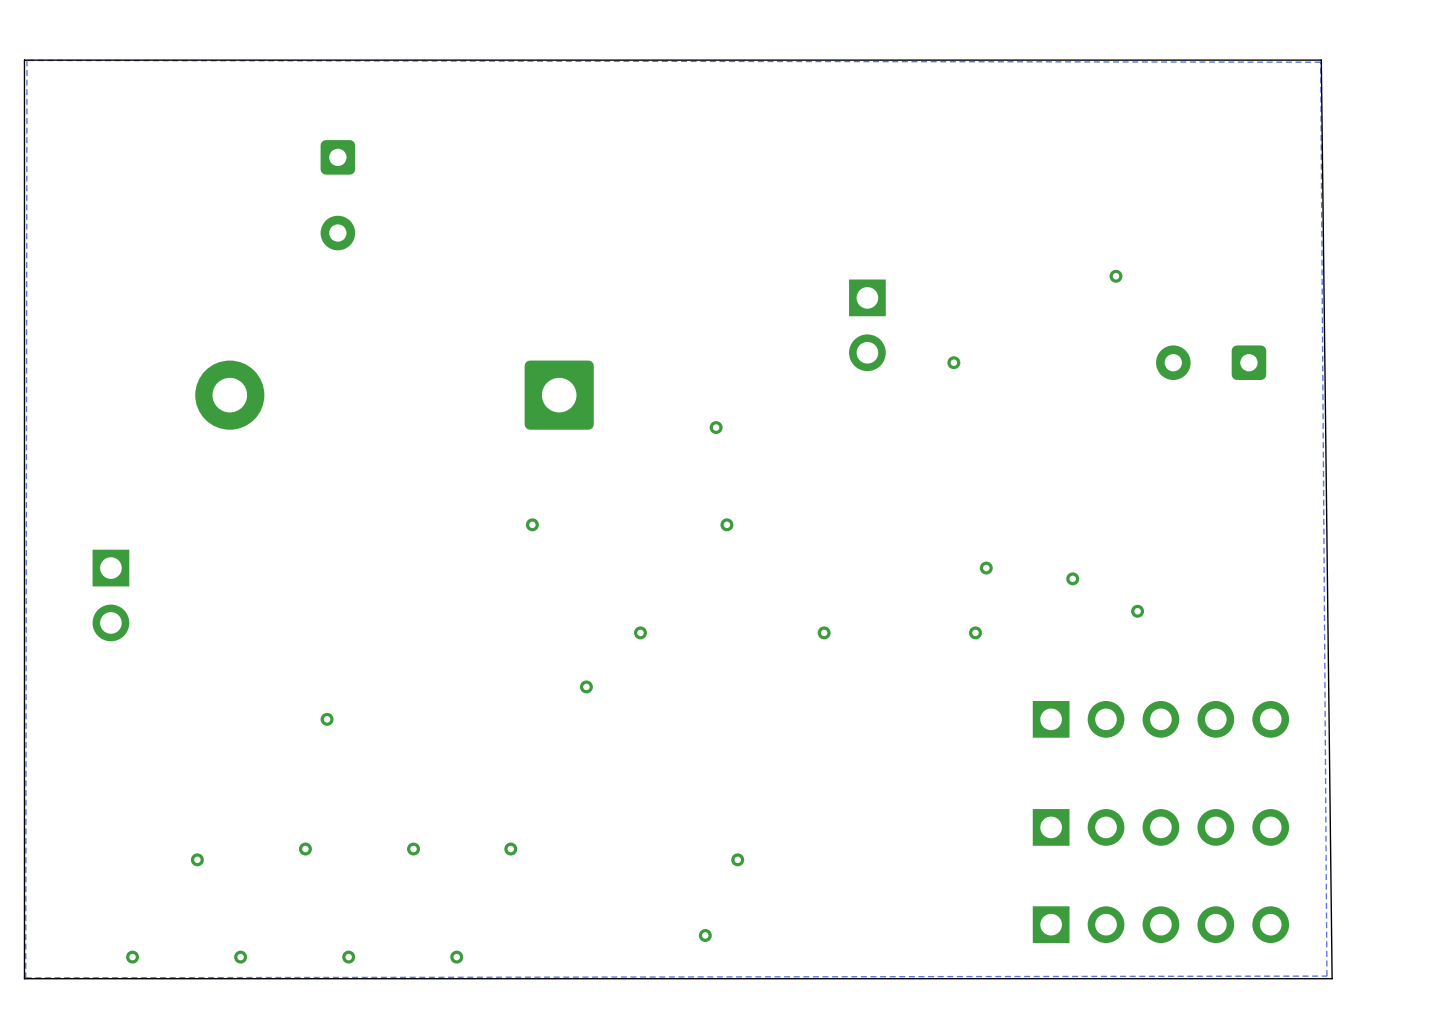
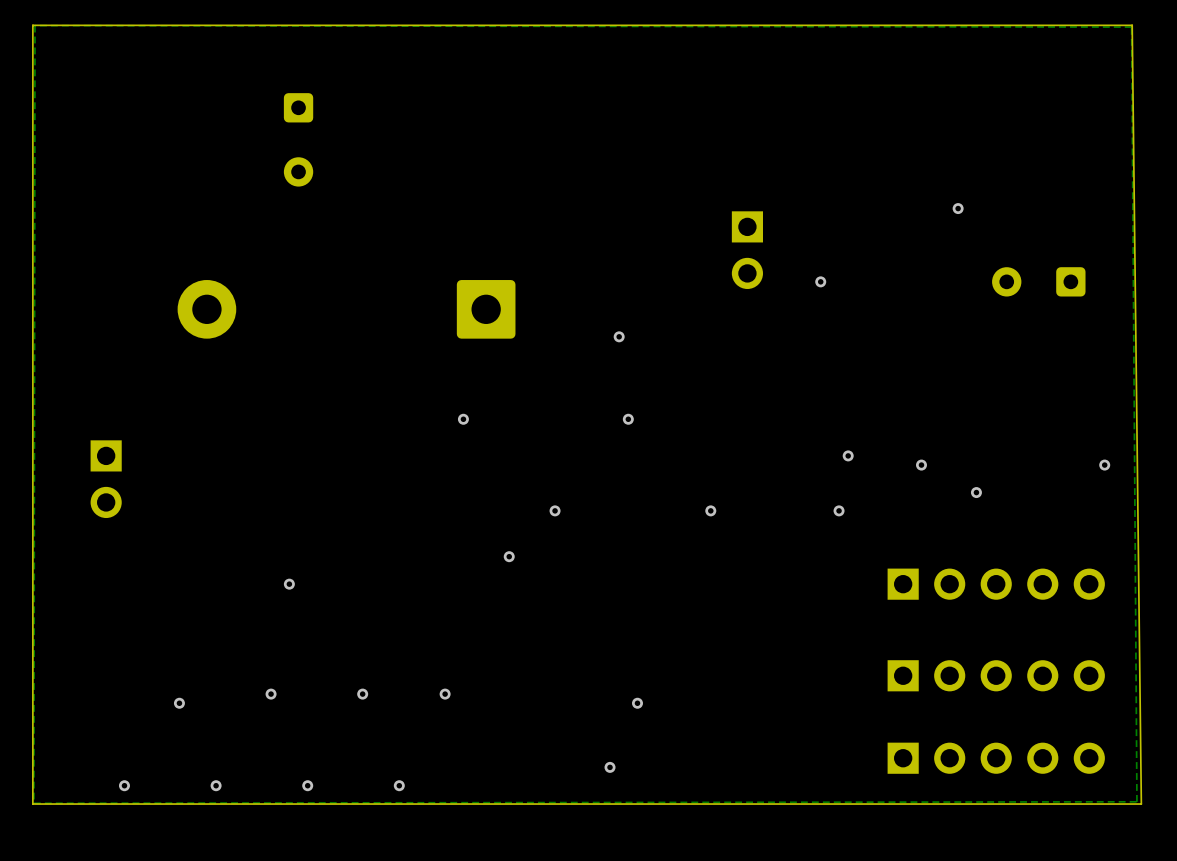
via: none -> (1104, 465)

